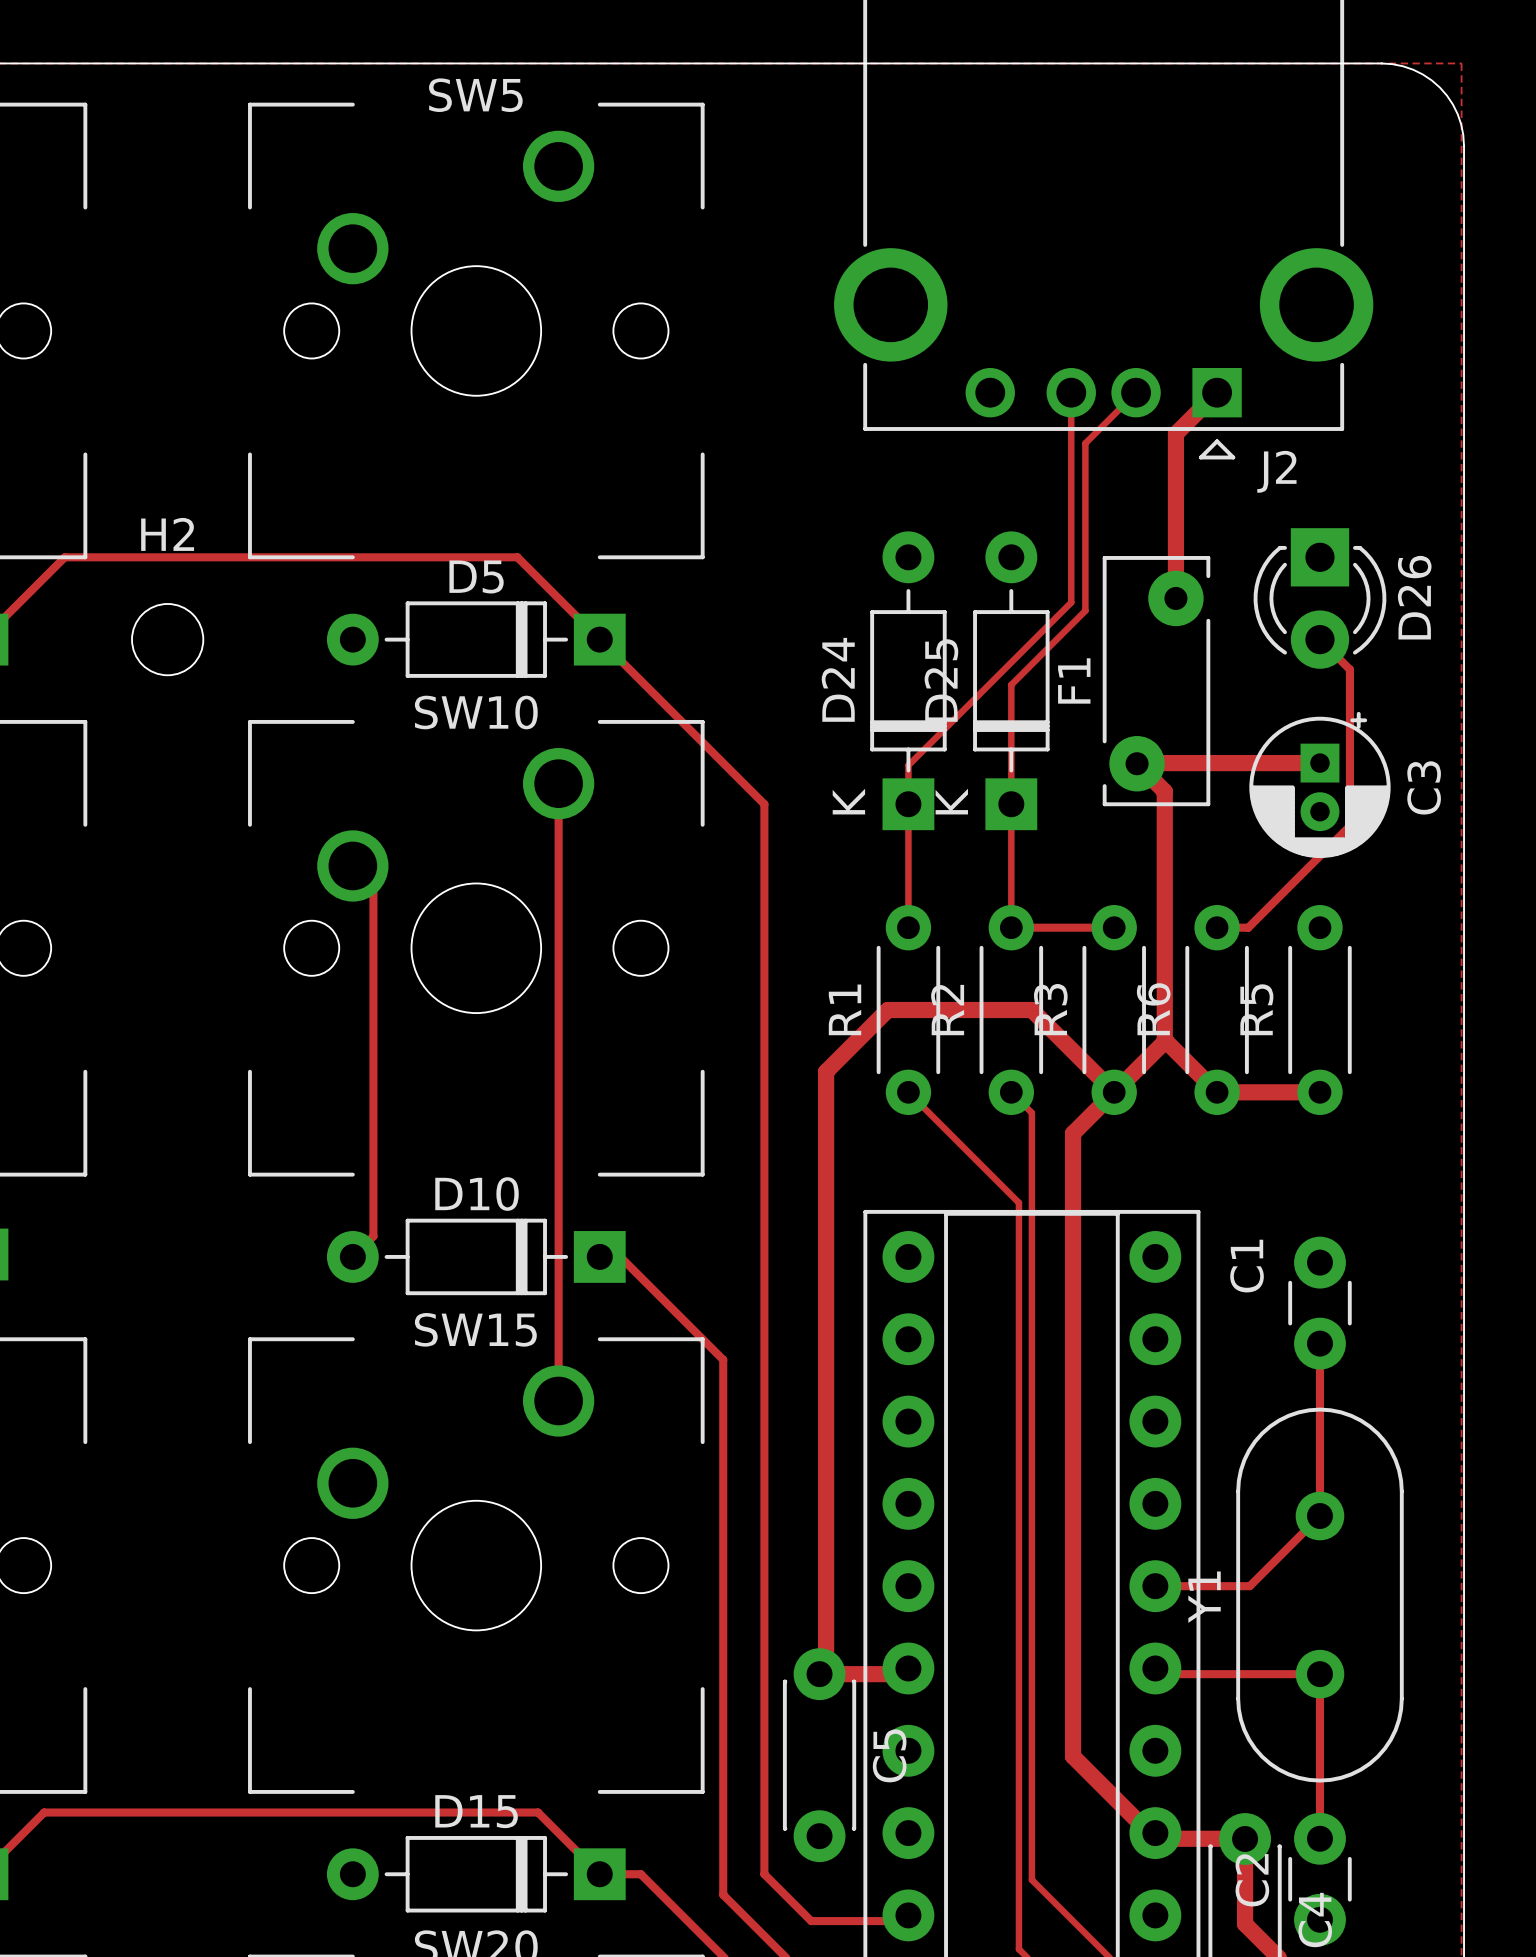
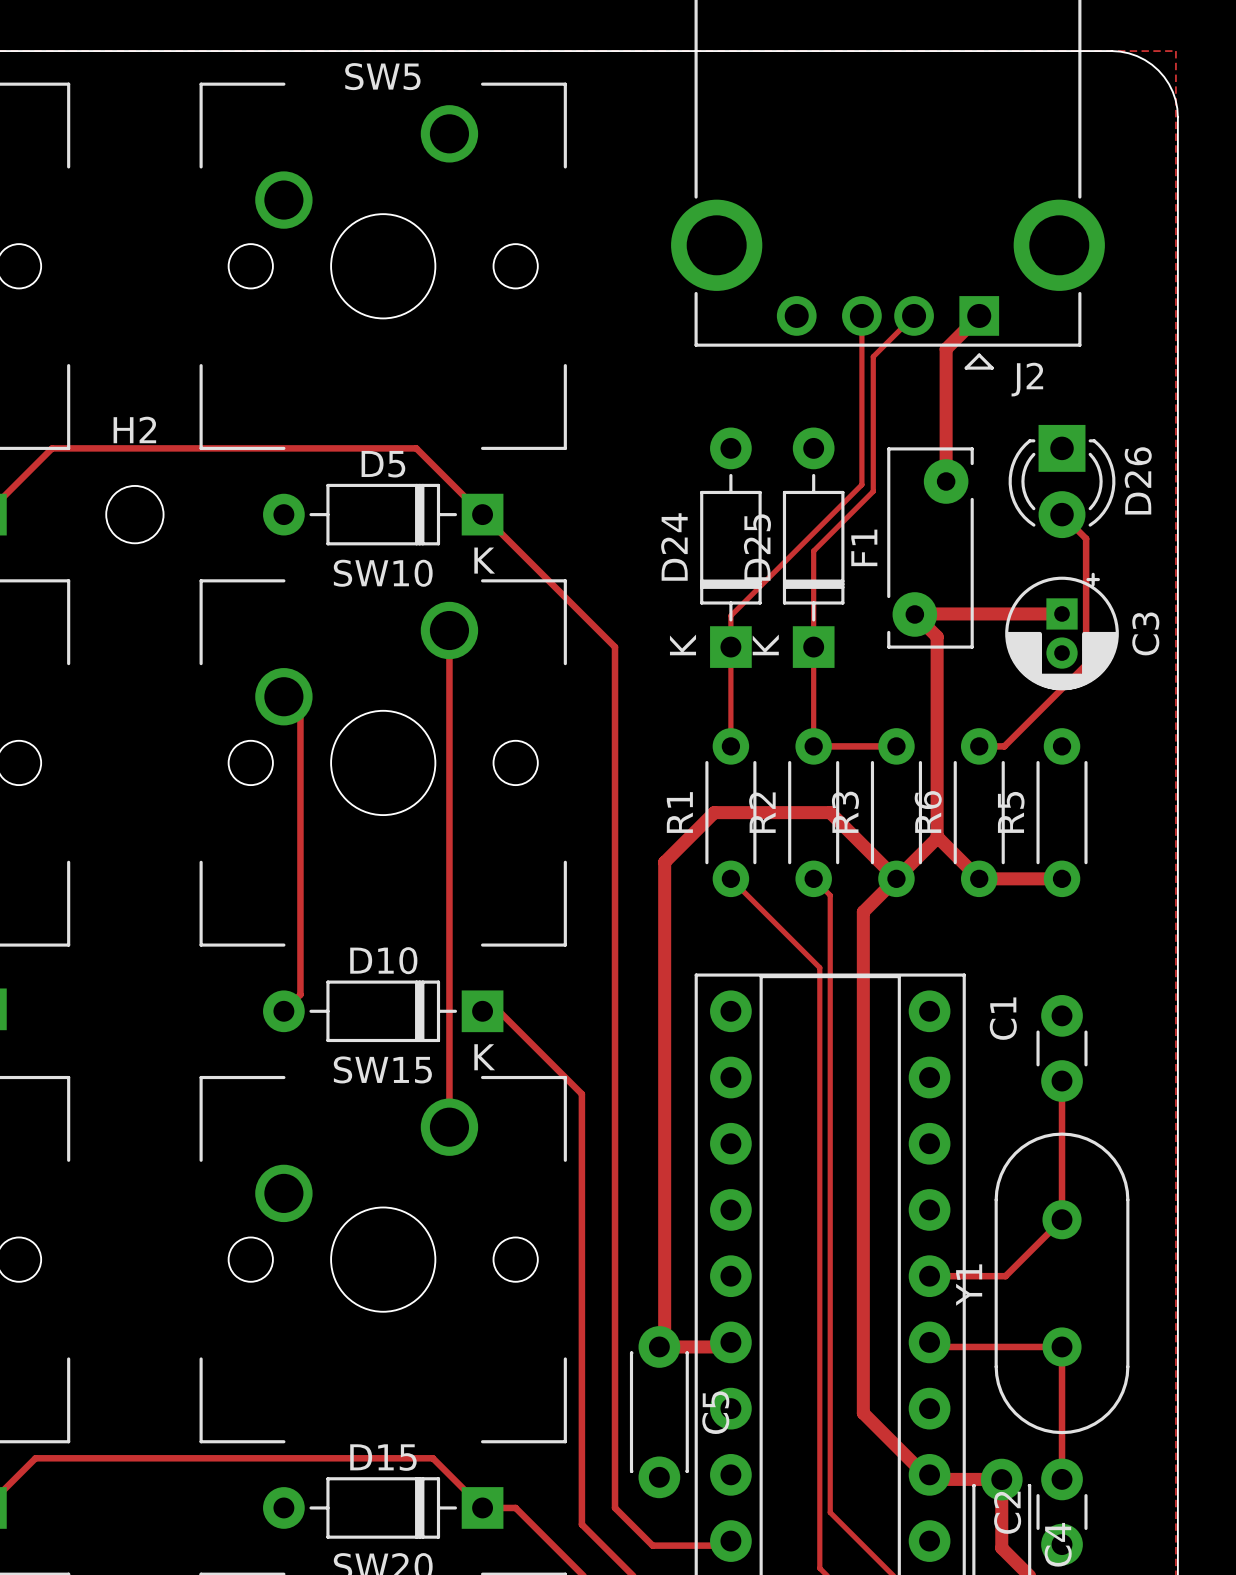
D5 text: none -> K (484, 560)
D10 text: none -> K (484, 1057)

